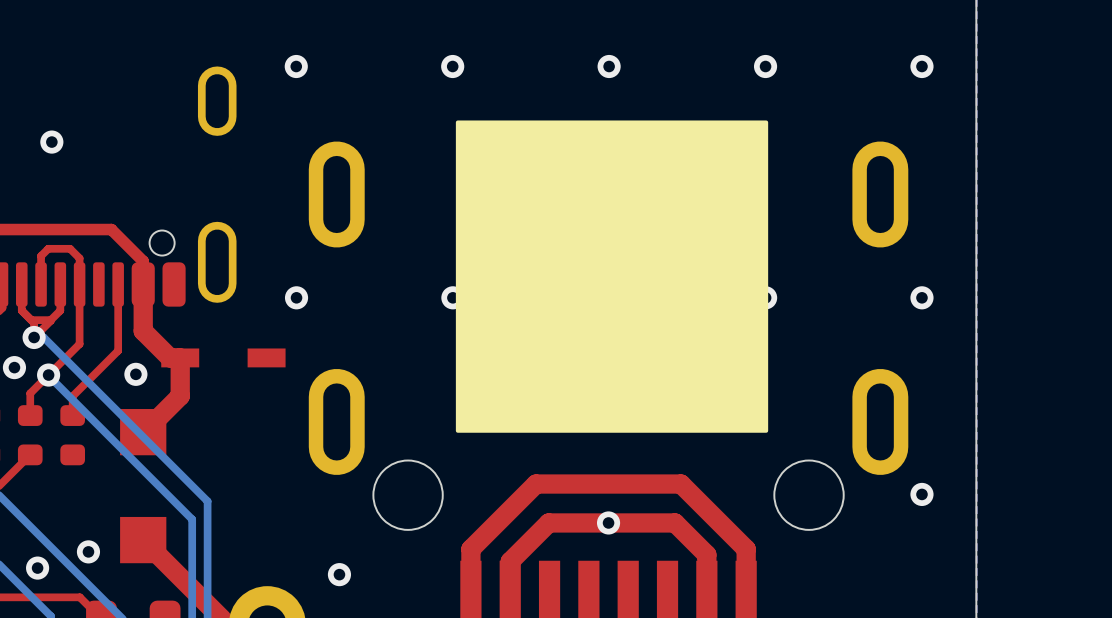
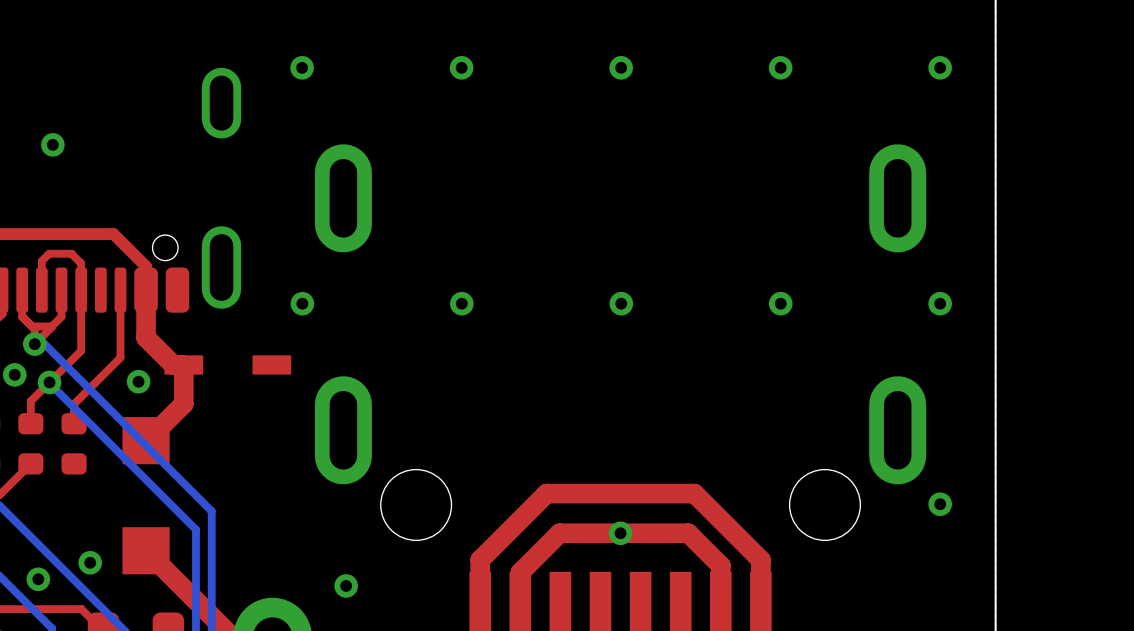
drawing: [455, 120, 769, 433] -> none

